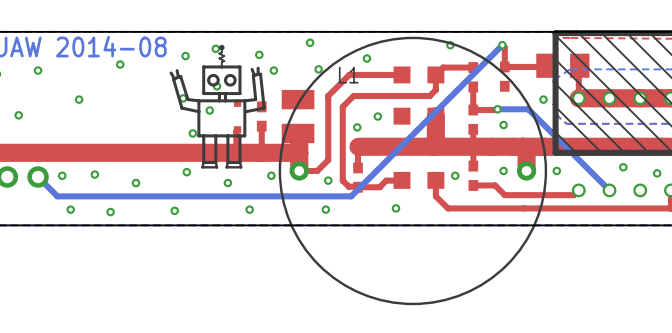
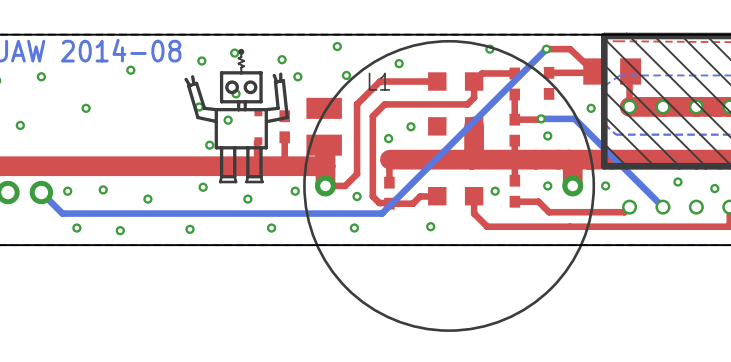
top track: (502, 45) (504, 47) (504, 66) -> (546, 49) (570, 49) (593, 71)

